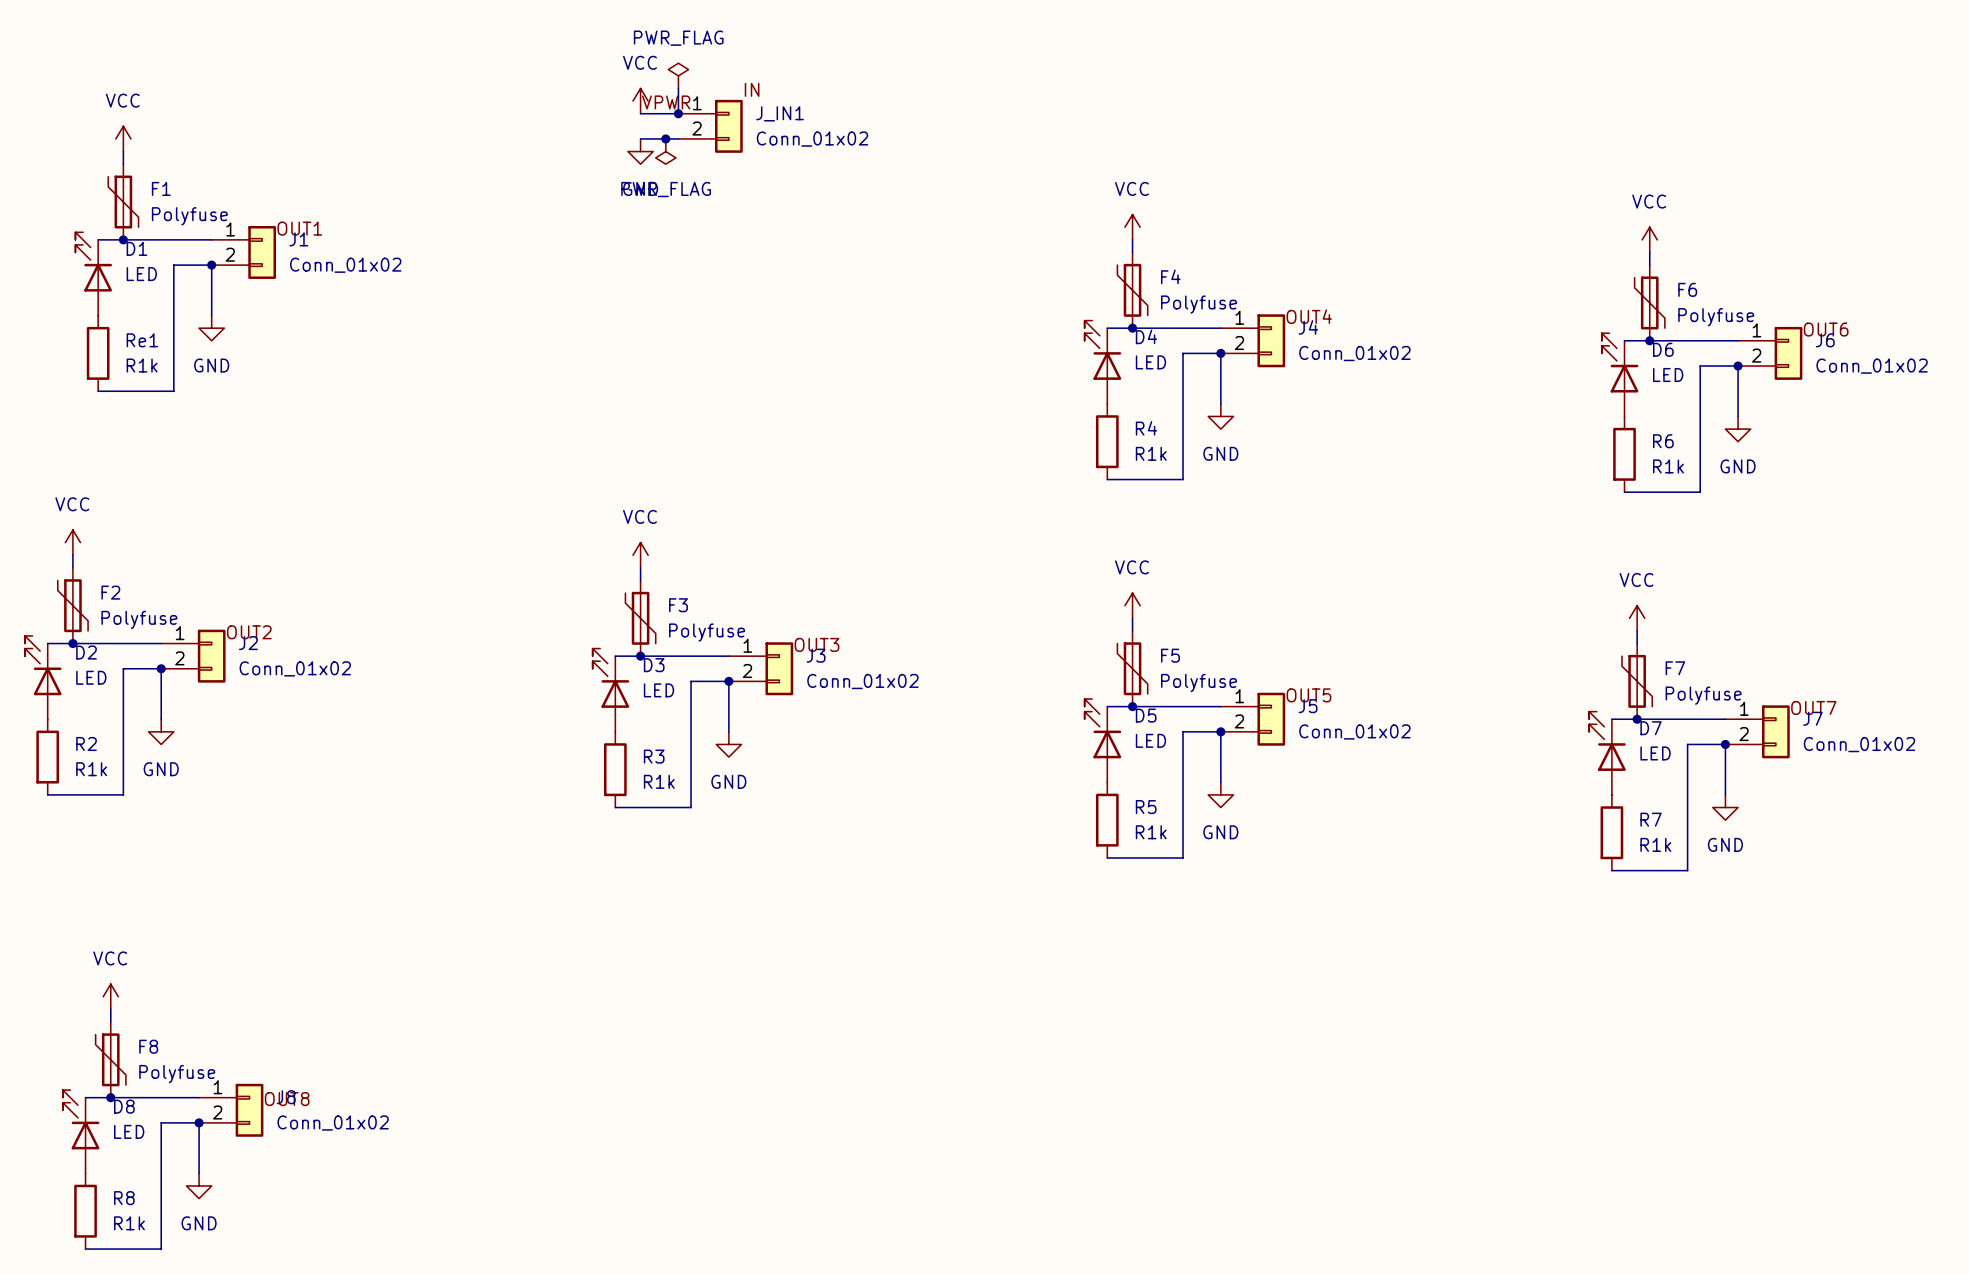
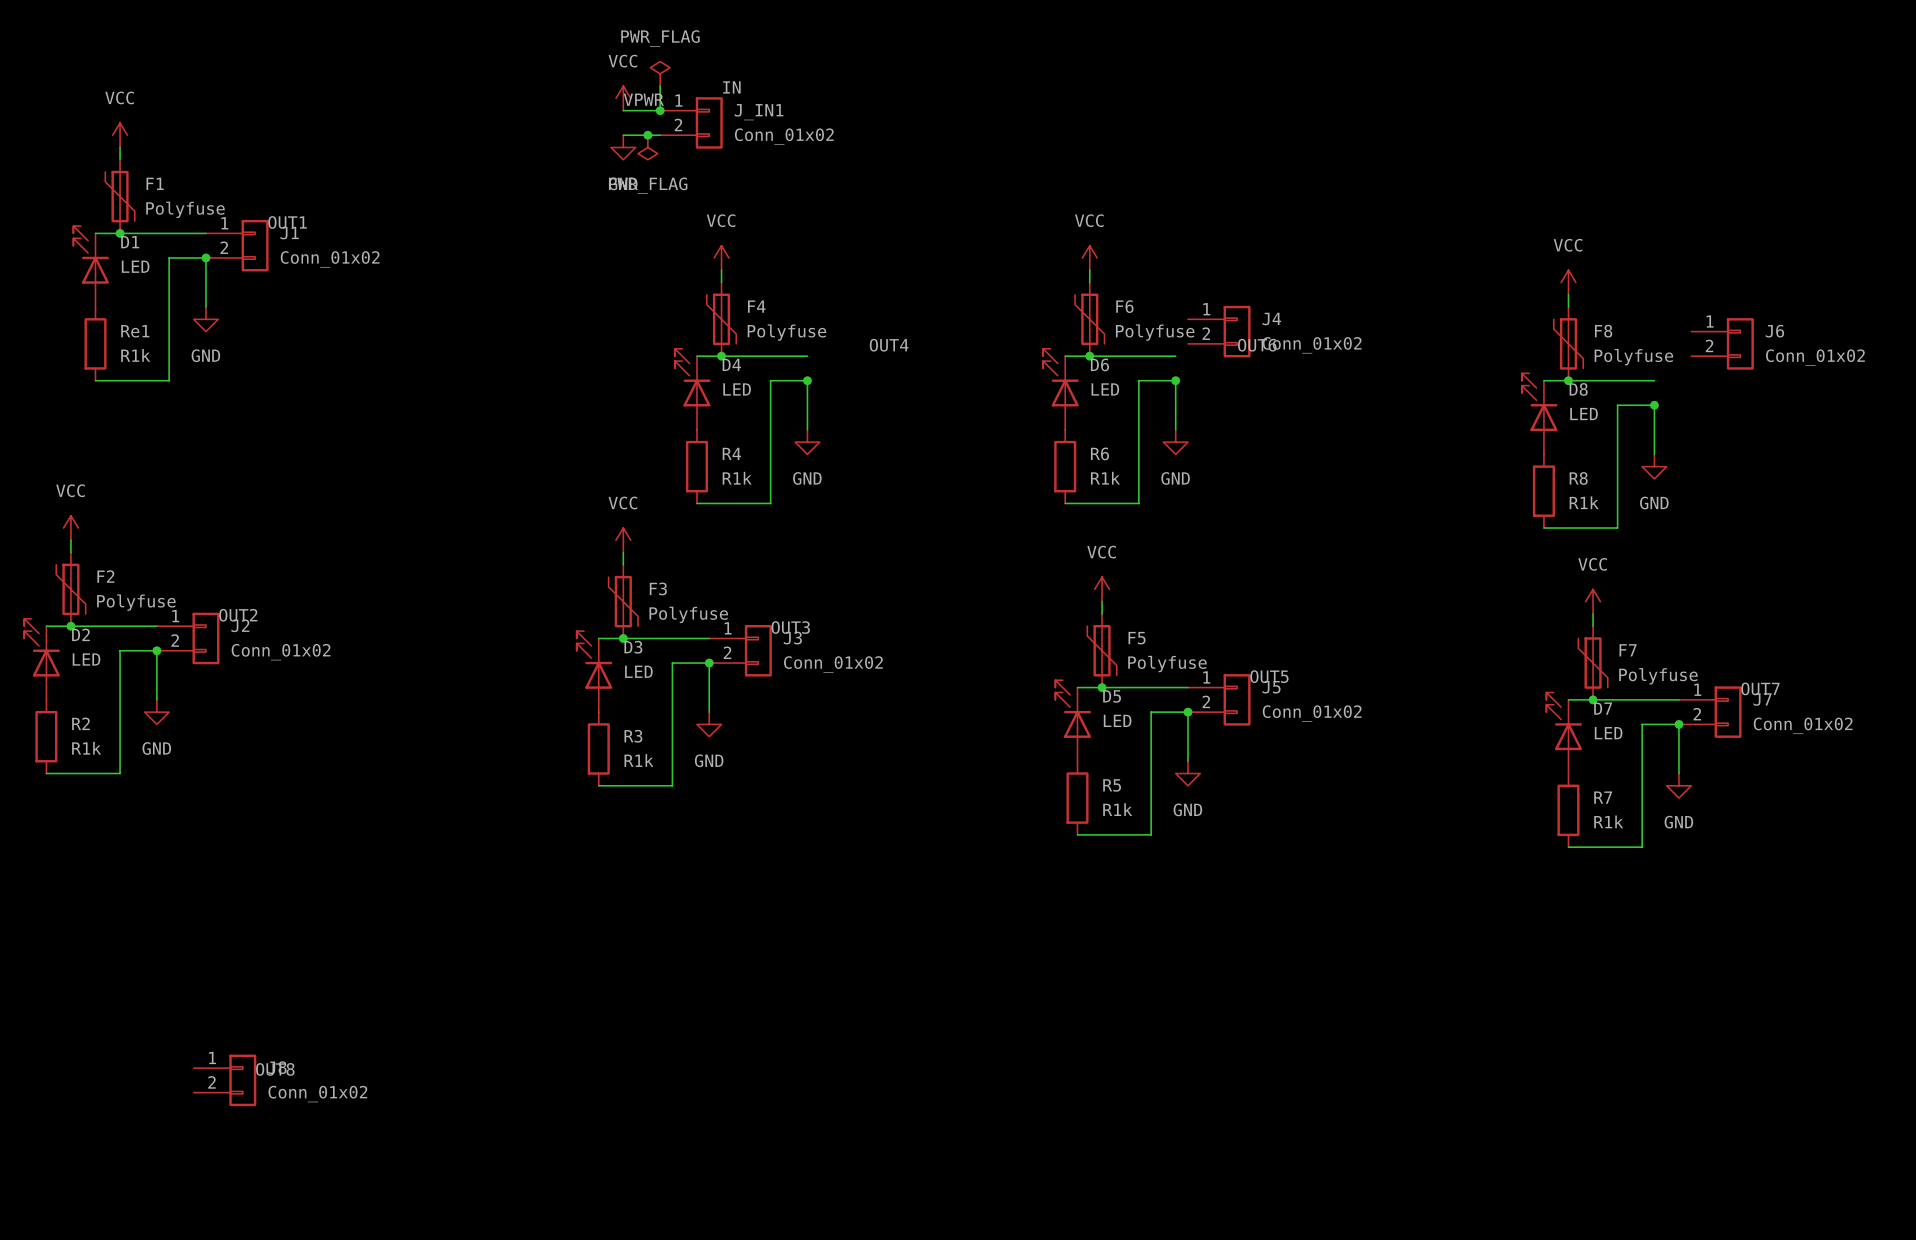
power symbol position: VCC (1132, 227) -> VCC (1089, 257)
wire: (1132, 239) (1132, 252) -> (1089, 270) (1089, 282)
power symbol position: VCC (1649, 239) -> VCC (1568, 282)
wire: (1649, 252) (1649, 265) -> (1568, 294) (1568, 307)
power symbol: none -> VCC (721, 257)
wire: none -> (721, 270) (721, 282)
F4 position: (1132, 290) -> (721, 319)
F6 position: (1649, 302) -> (1089, 319)
label: OUT4 (1309, 316) -> none
wire: (1107, 328) (1220, 328) -> (1065, 356) (1175, 356)
junction position: (1132, 328) -> (1089, 356)
label: OUT6 (1826, 329) -> none
wire: (1624, 340) (1738, 340) -> (1543, 380) (1654, 380)
junction: (1649, 340) -> none
junction position: (1220, 353) -> (1175, 380)
label: none -> OUT4 (889, 345)
label: none -> OUT6 (1257, 345)
D4 position: (1102, 362) -> (692, 389)
wire: none -> (696, 356) (807, 356)
junction: none -> (721, 356)
junction: (1738, 366) -> none
D6 position: (1620, 374) -> (1060, 389)
junction: none -> (807, 380)
junction: none -> (1568, 380)
wire: (1220, 403) (1220, 353) (1183, 353) (1183, 479) (1107, 479) -> (1175, 429) (1175, 380) (1138, 380) (1138, 503) (1065, 503)
power symbol position: GND (1220, 416) -> GND (1175, 442)
wire: (1700, 416) (1700, 366) (1738, 366) (1738, 416) -> (1654, 405) (1617, 405) (1617, 528) (1543, 528)
junction: none -> (1654, 405)
power symbol position: GND (1738, 429) -> GND (1654, 466)
wire: none -> (807, 429) (807, 380) (770, 380) (770, 503) (696, 503)
R4 position: (1107, 441) -> (696, 466)
power symbol: none -> GND (807, 442)
R6 position: (1624, 454) -> (1065, 466)
wire: (1700, 466) (1700, 492) (1624, 492) -> none
power symbol: VCC (110, 996) -> none
wire: (110, 1009) (110, 1021) -> none
F8 position: (110, 1059) -> (1568, 343)
wire: (85, 1097) (199, 1097) -> none
junction: (110, 1097) -> none
junction: (199, 1122) -> none
D8 position: (81, 1131) -> (1539, 413)
wire: (199, 1173) (199, 1122) (161, 1122) (161, 1249) (85, 1249) -> none
power symbol: GND (199, 1185) -> none
R8 position: (85, 1211) -> (1543, 491)

